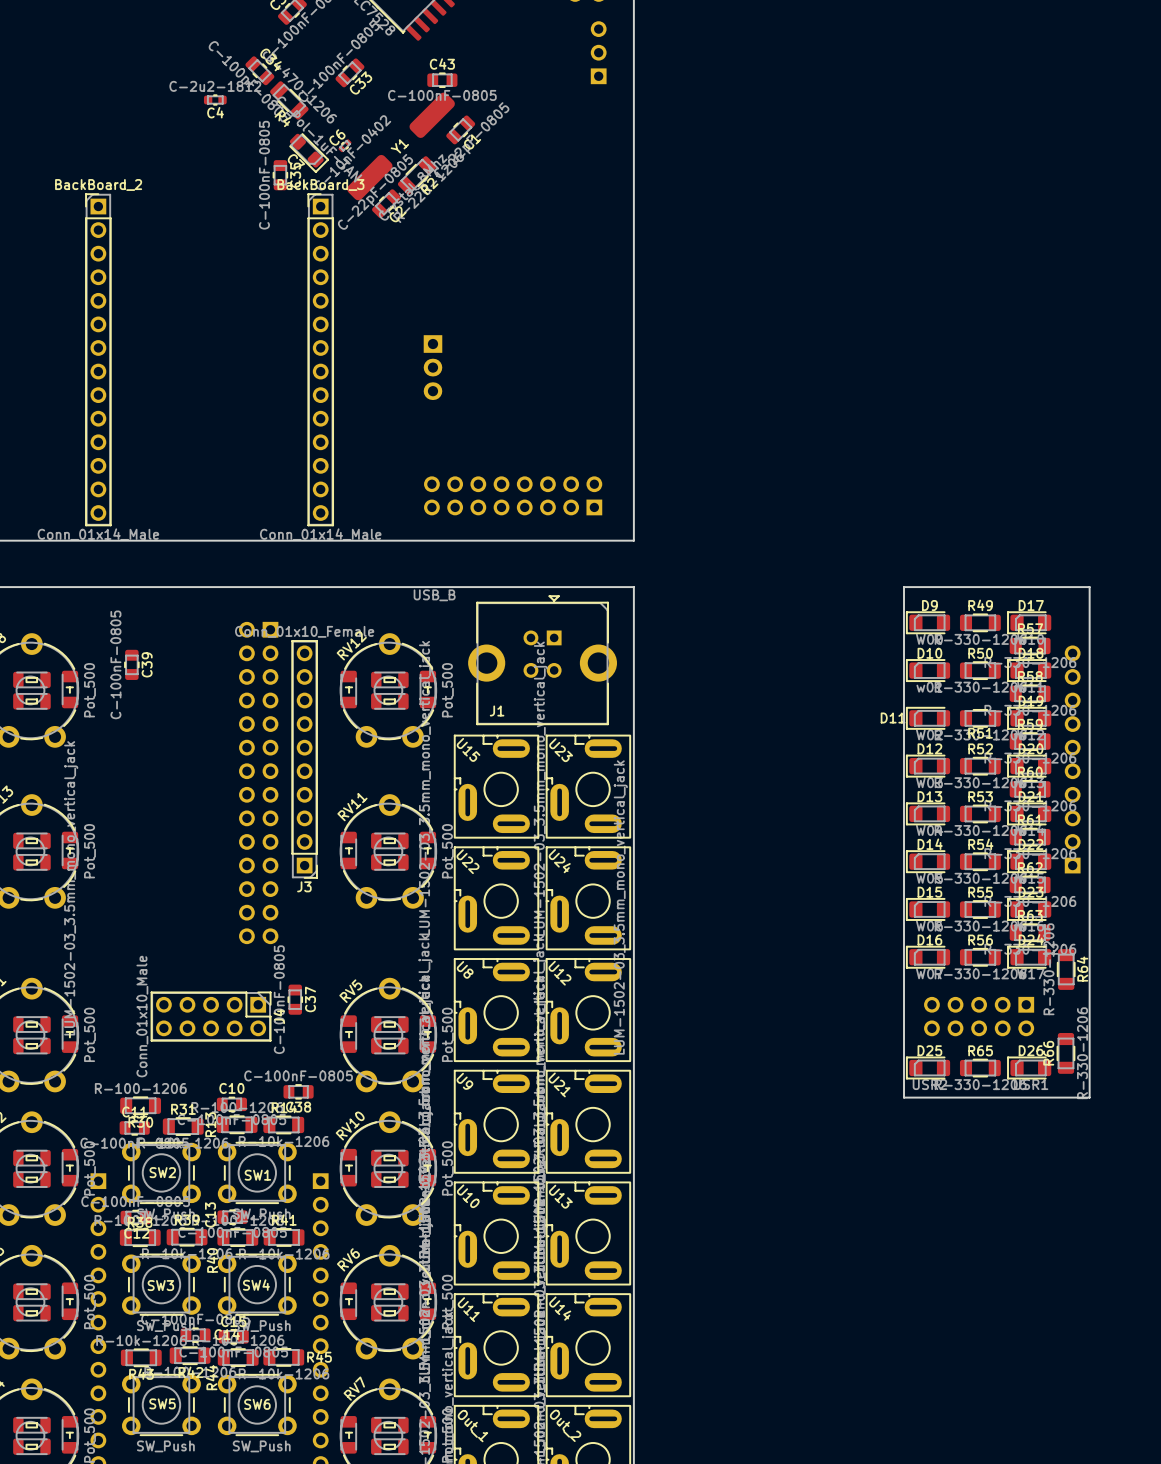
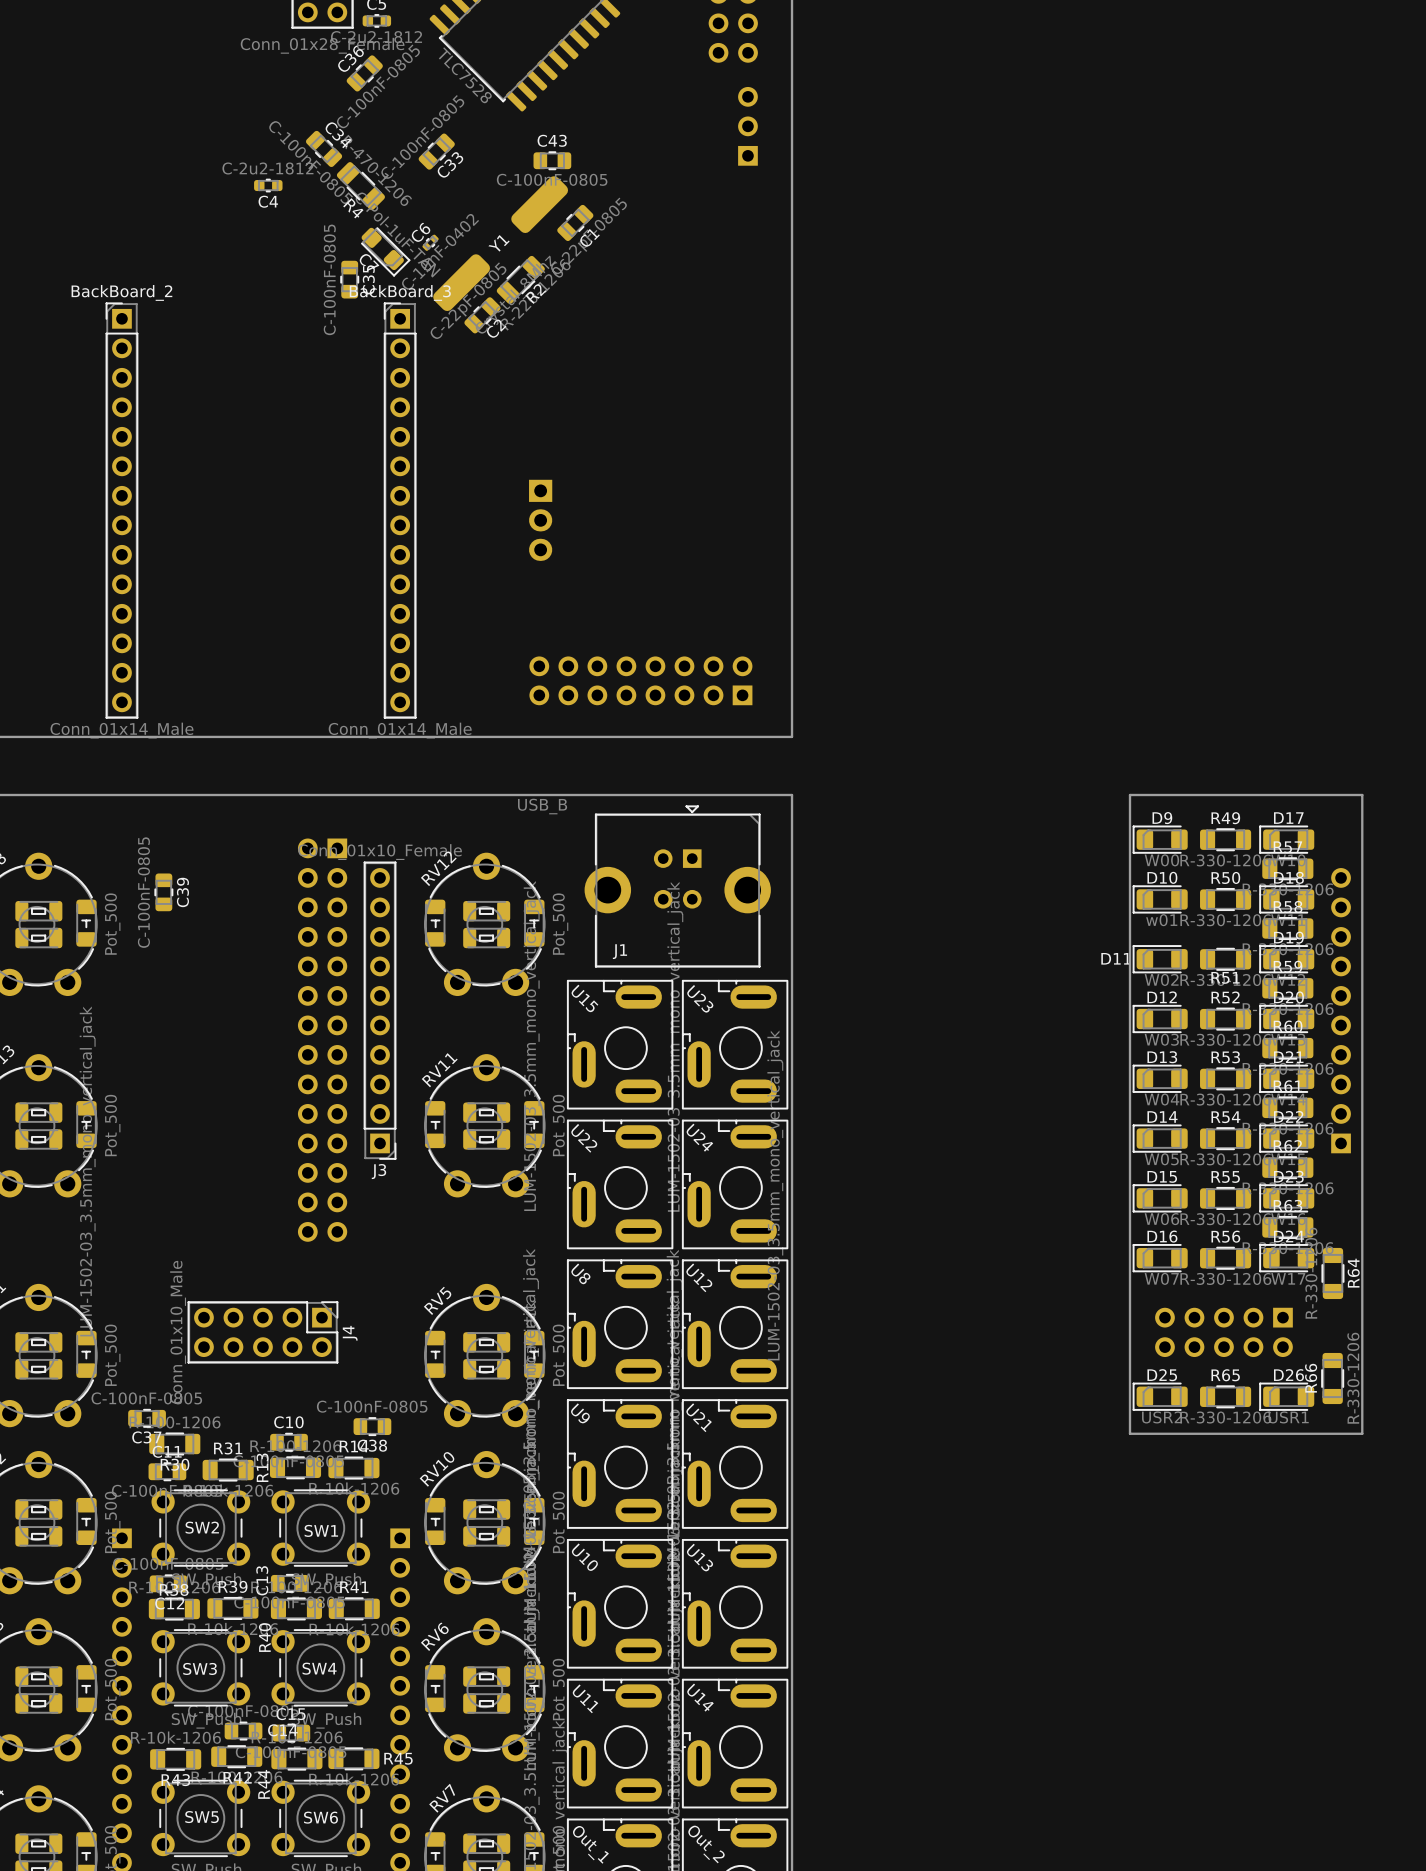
C37 rotation: 0° (295, 999) -> 90° clockwise (147, 1418)
C37 position: (295, 999) -> (147, 1418)

